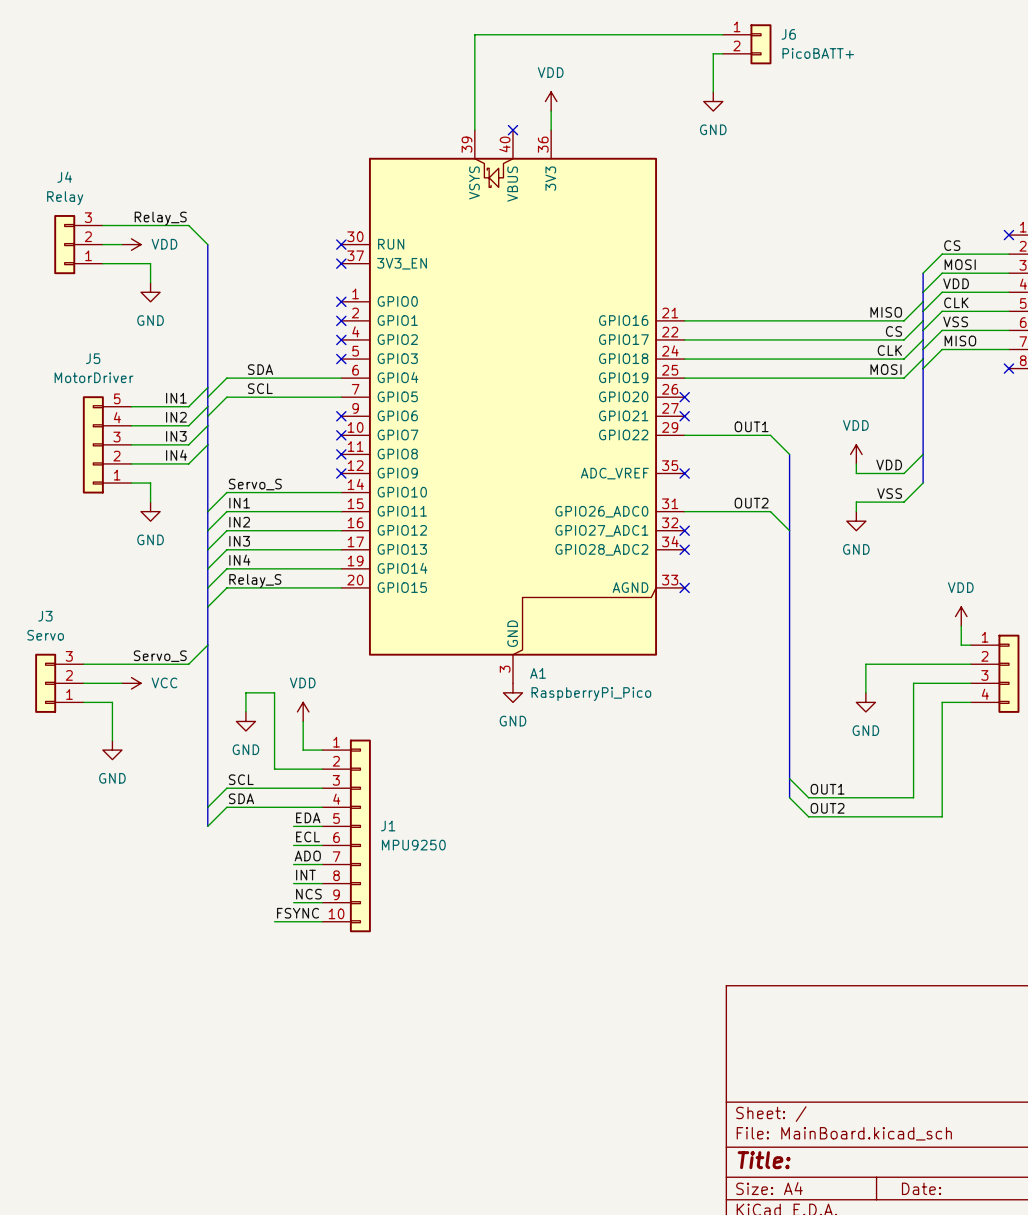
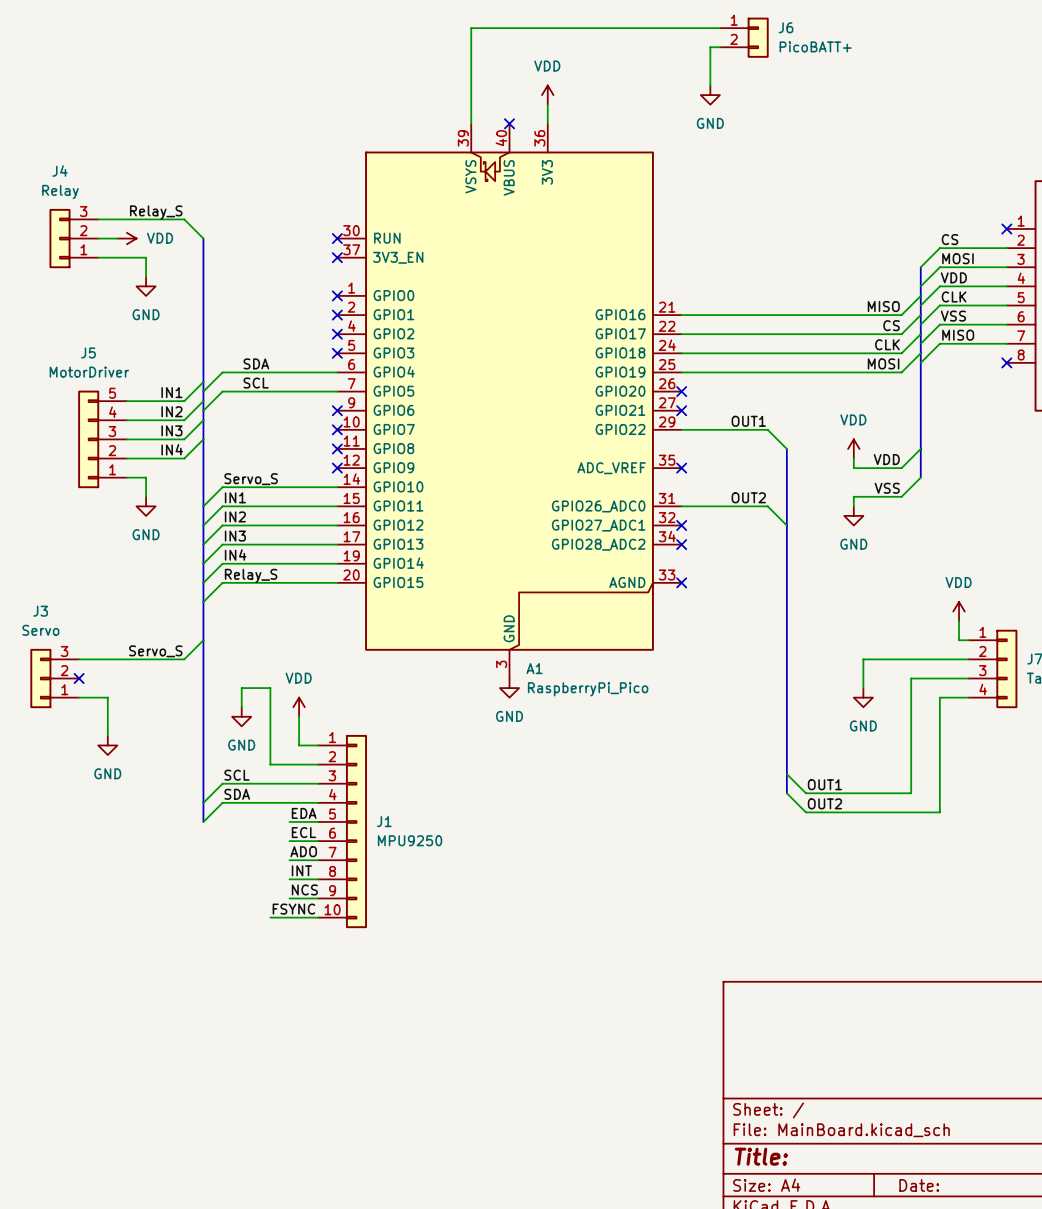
wire: (83, 683) (121, 683) -> none
no-connect mark: none -> (79, 678)
power symbol: VCC (131, 683) -> none

